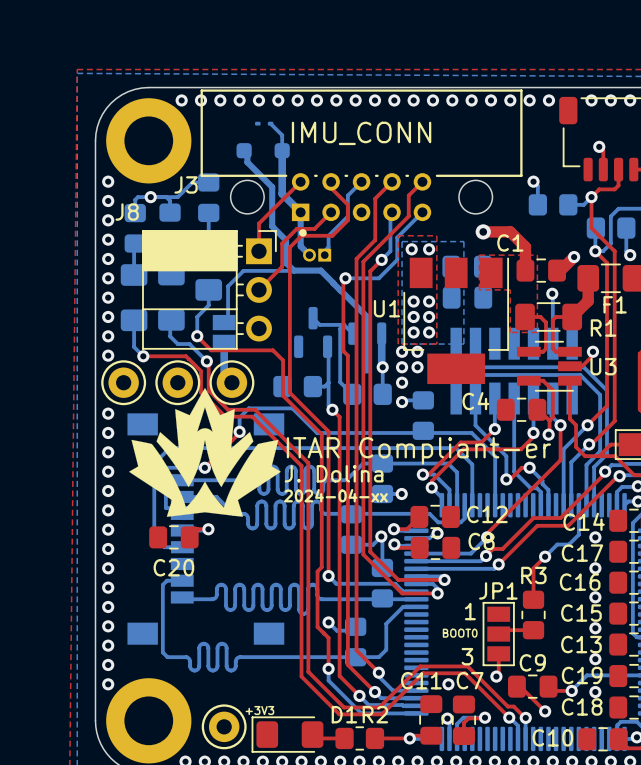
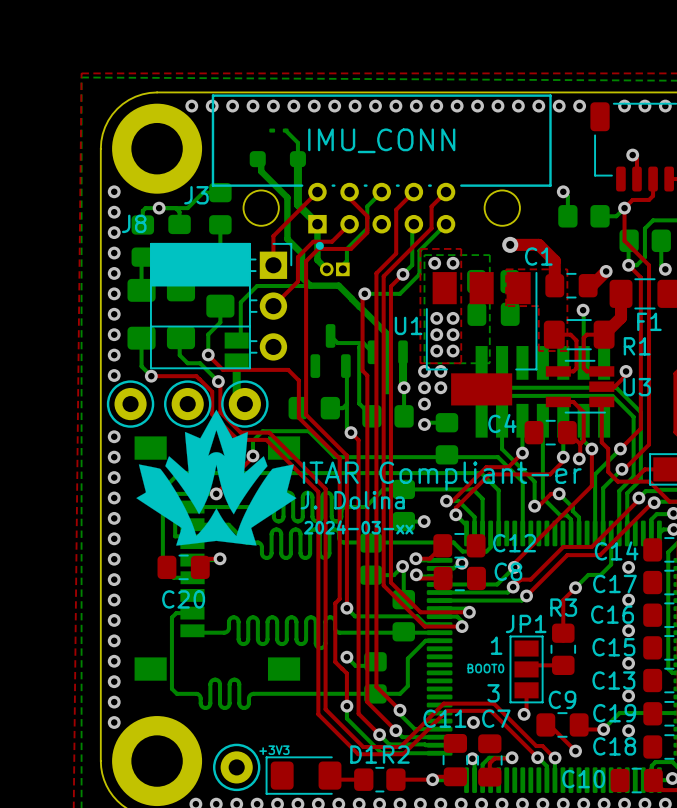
text: 2024-04-xx (335, 495) -> 2024-03-xx (358, 527)

